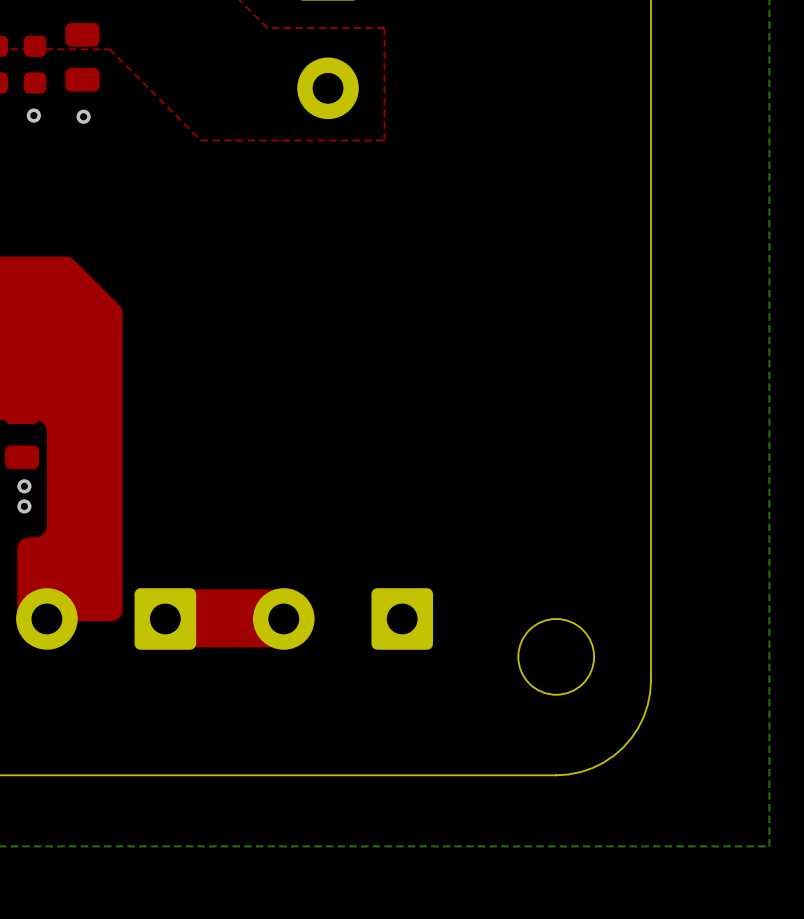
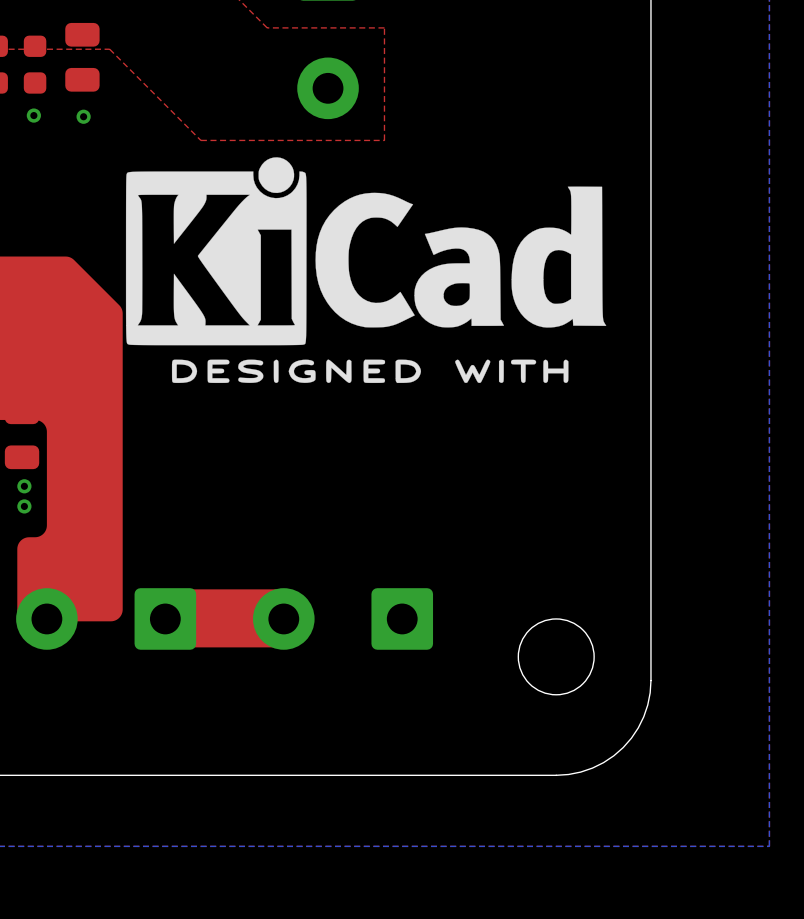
drawing: none -> [125, 157, 607, 384]

